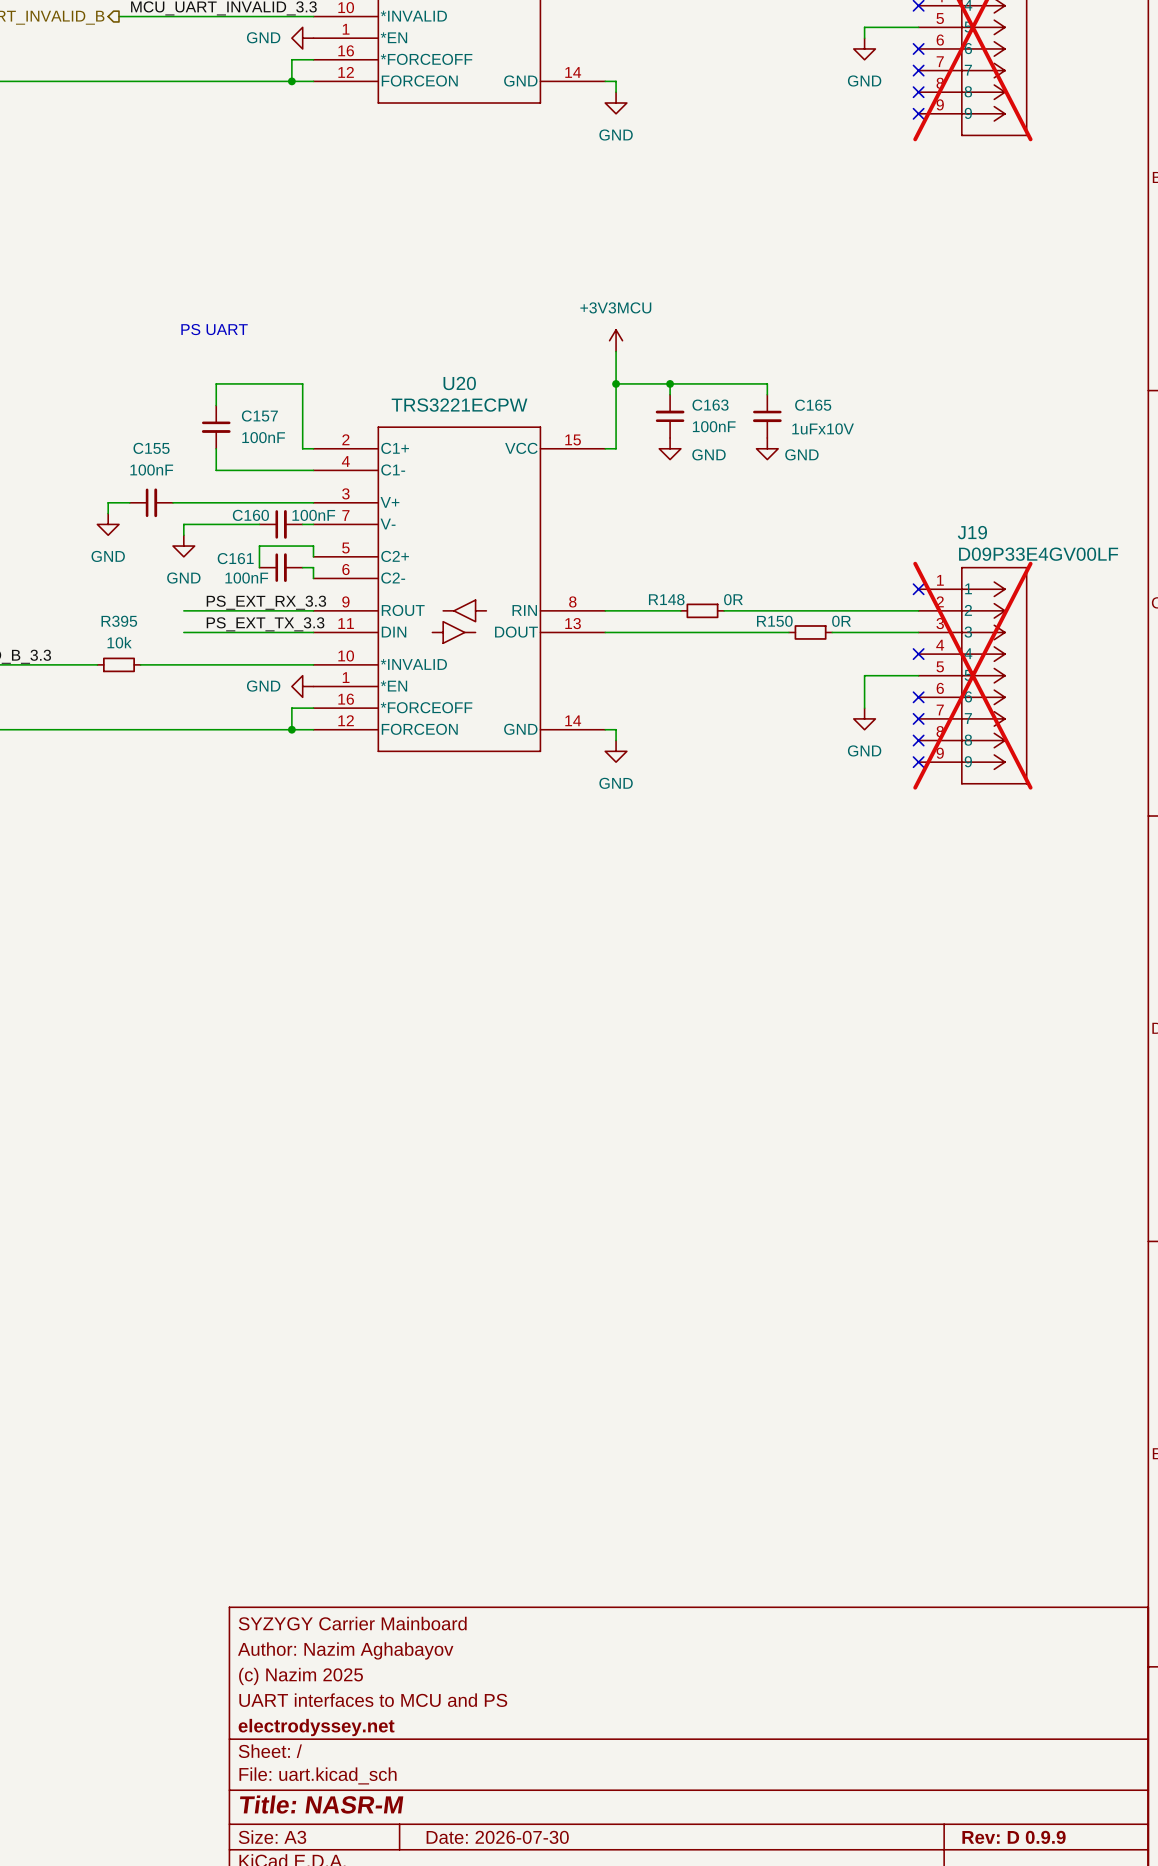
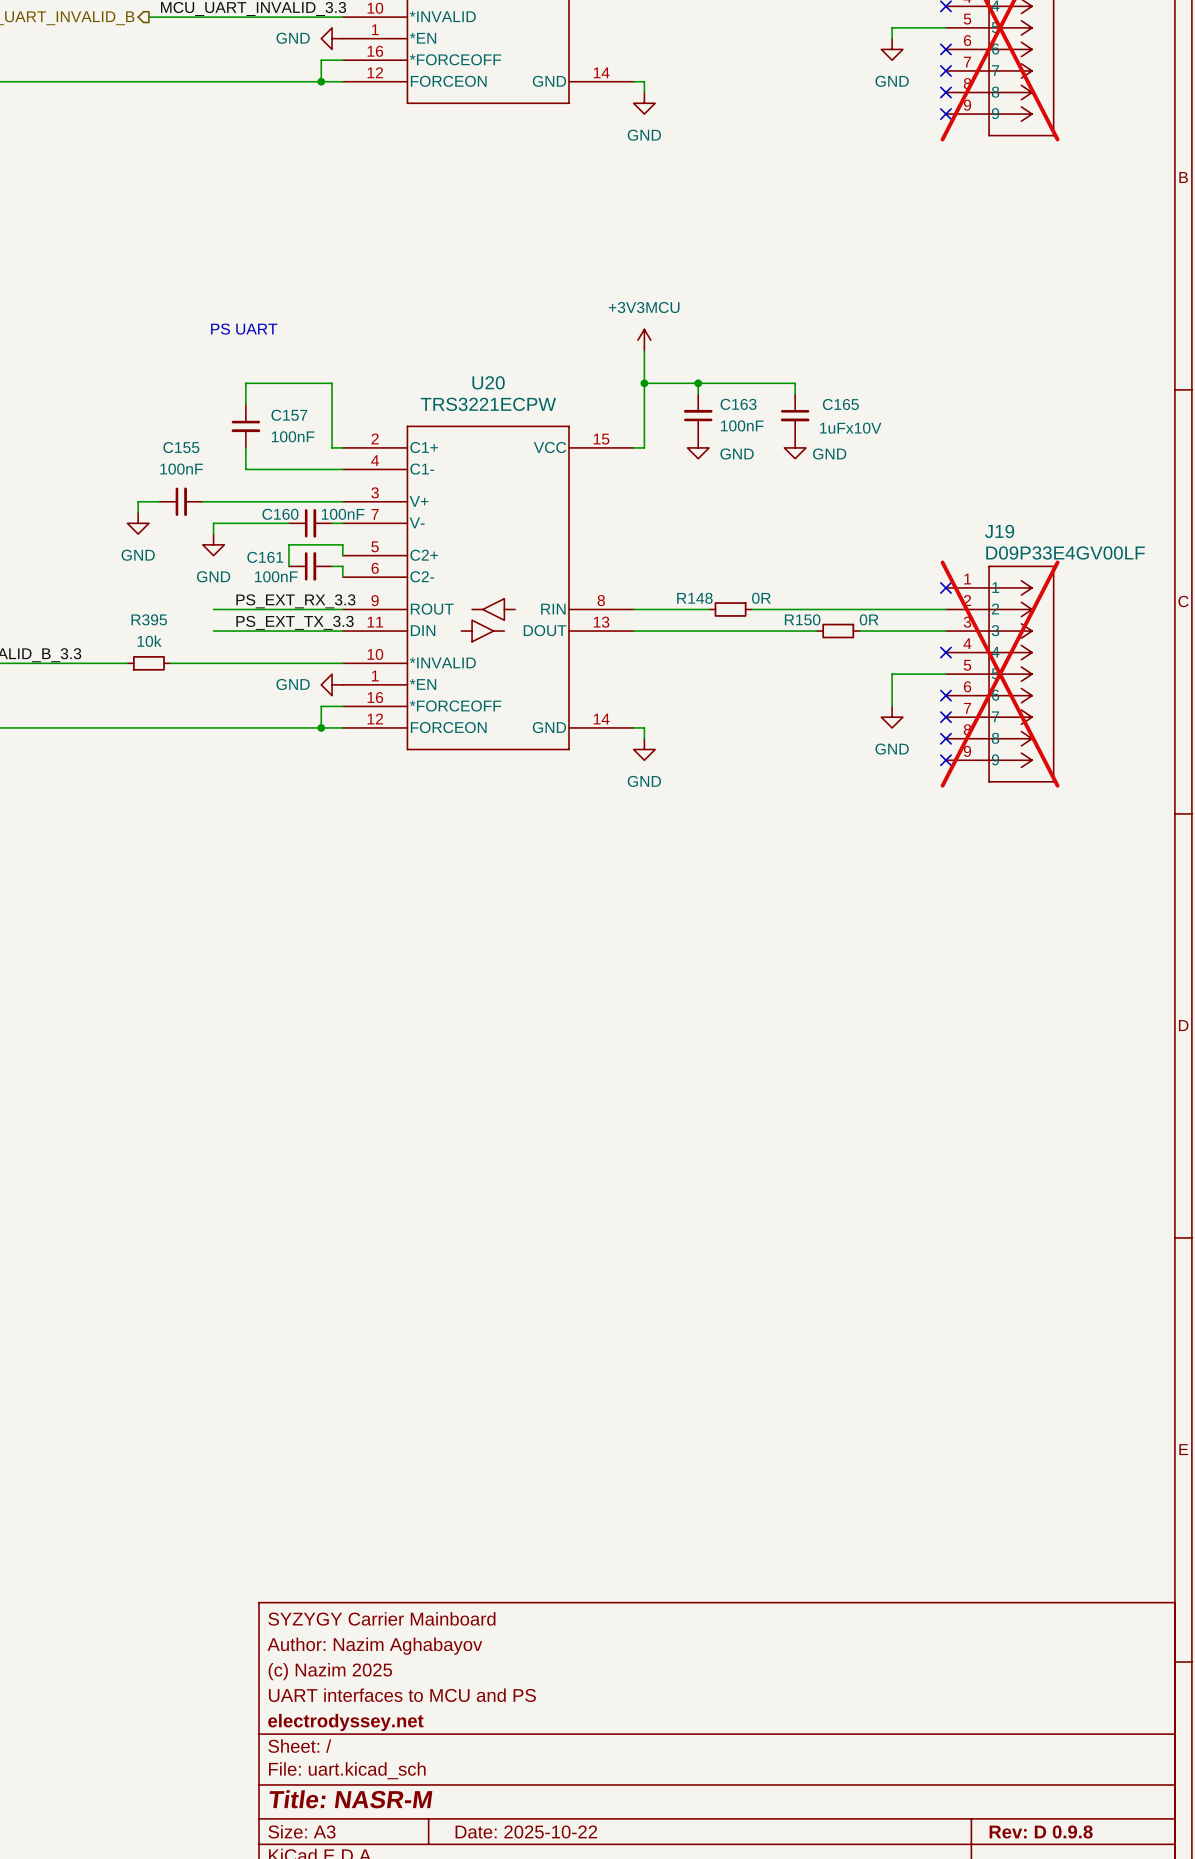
title block: Date: 2026-07-30 (497, 1837) -> Date: 2025-10-22 (526, 1831)
title block: Rev: D 0.9.9 (1014, 1837) -> Rev: D 0.9.8 (1041, 1831)

